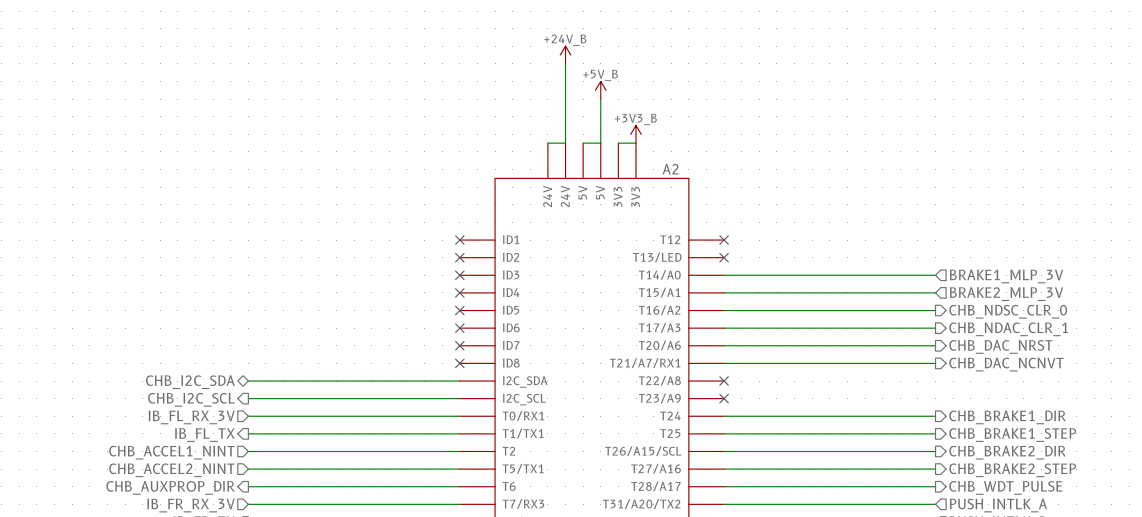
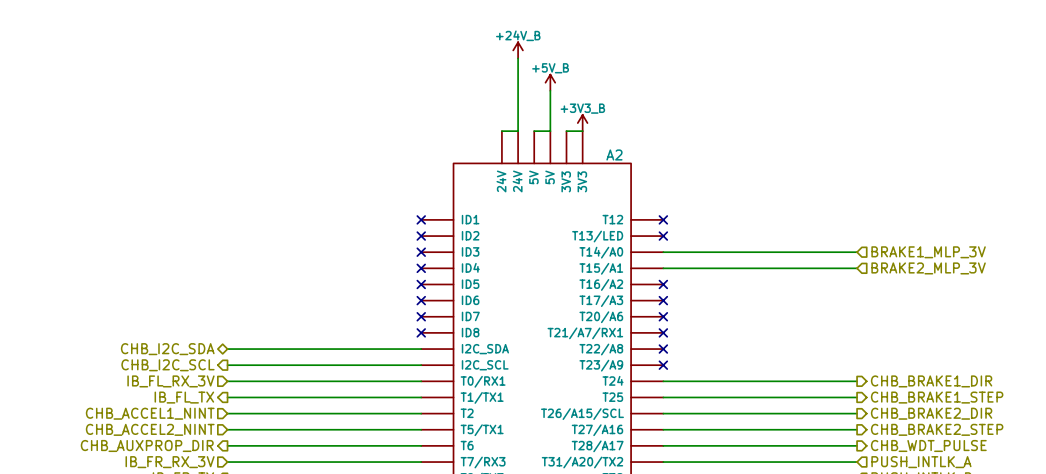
wire: (724, 310) (935, 310) -> none
no-connect mark: none -> (663, 284)
hierarchical label: CHB_NDSC_CLR_0 (1008, 311) -> none
wire: (724, 328) (935, 328) -> none
no-connect mark: none -> (663, 300)
hierarchical label: CHB_NDAC_CLR_1 (1008, 329) -> none
wire: (724, 345) (935, 345) -> none
no-connect mark: none -> (663, 316)
hierarchical label: CHB_DAC_NRST (1000, 346) -> none
wire: (724, 363) (935, 363) -> none
no-connect mark: none -> (663, 332)
hierarchical label: CHB_DAC_NCNVT (1006, 364) -> none

